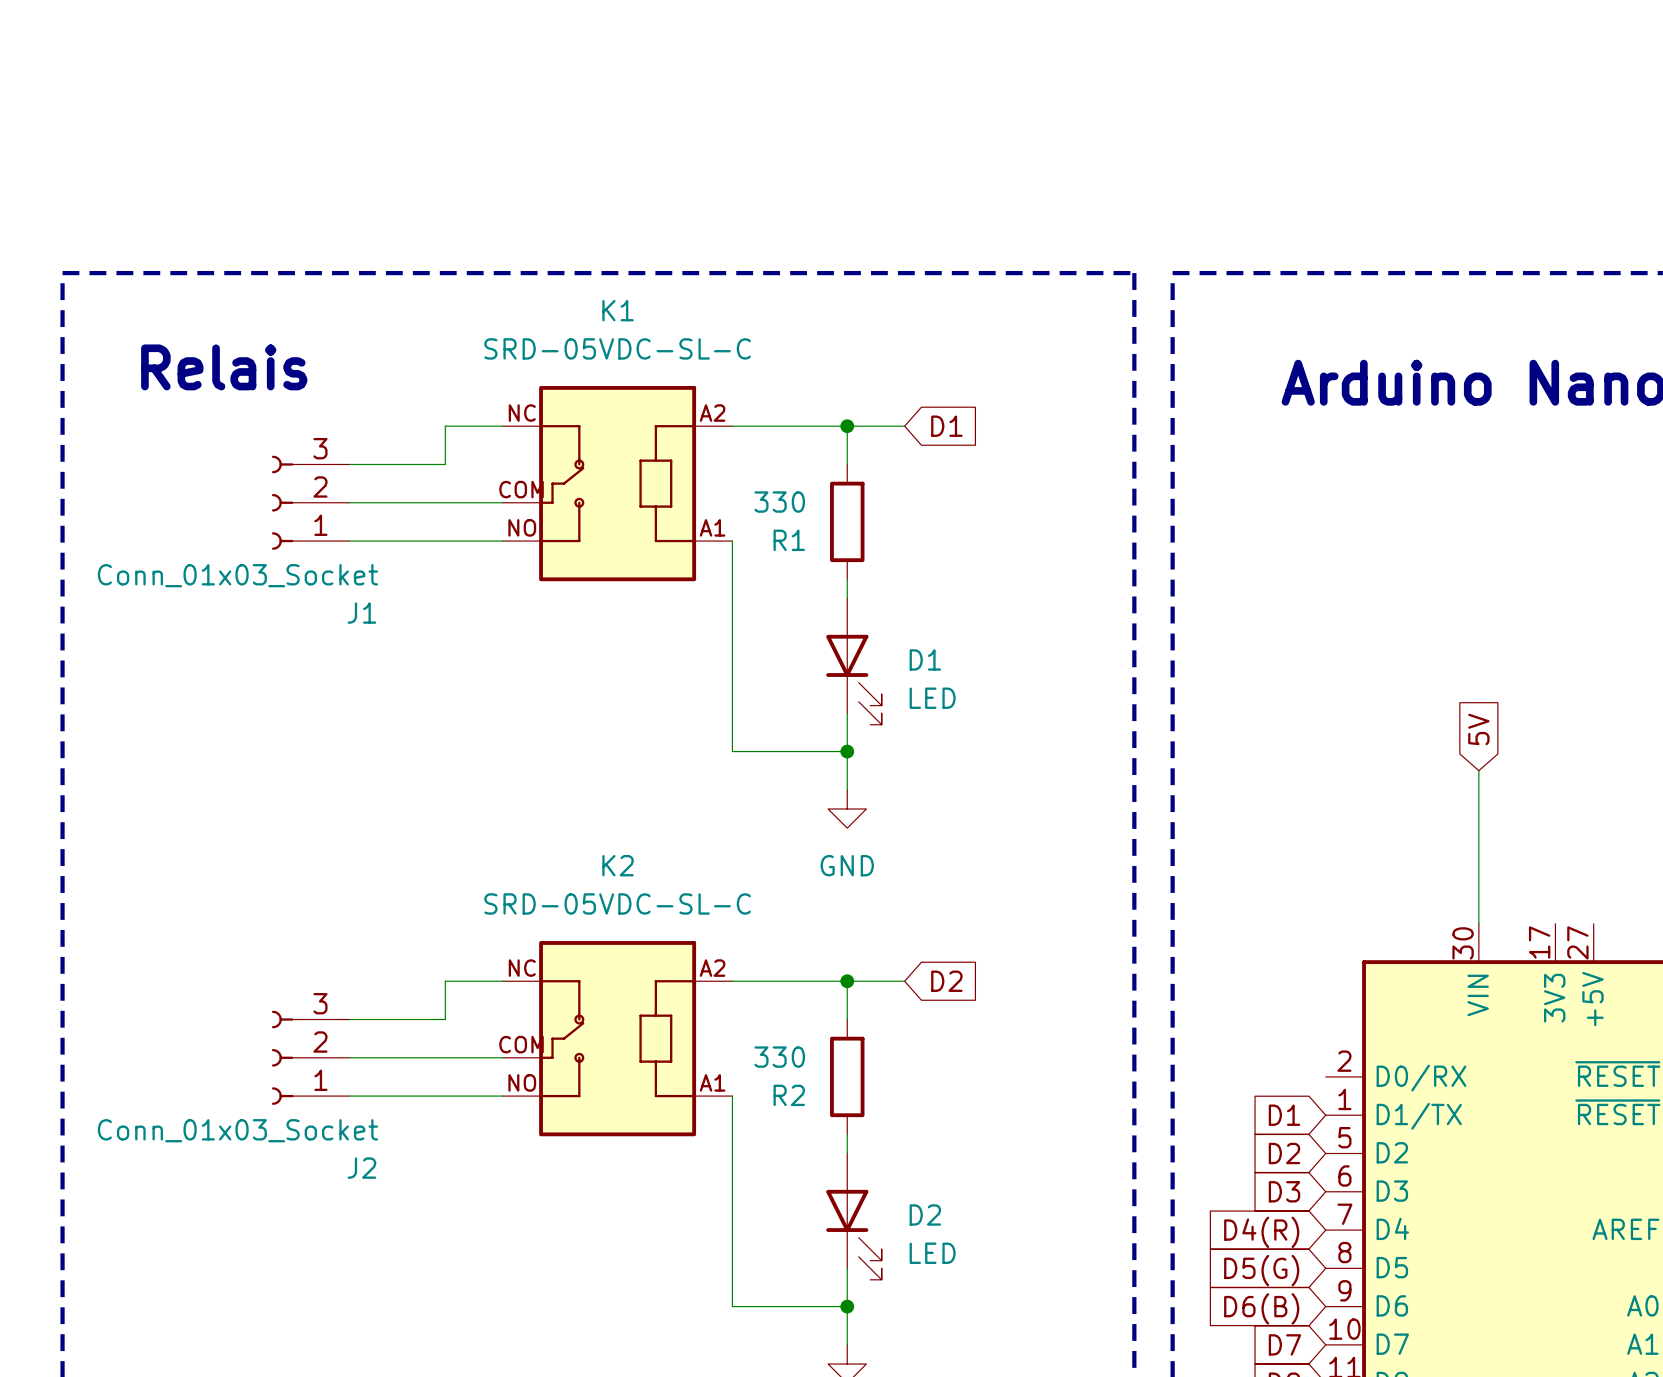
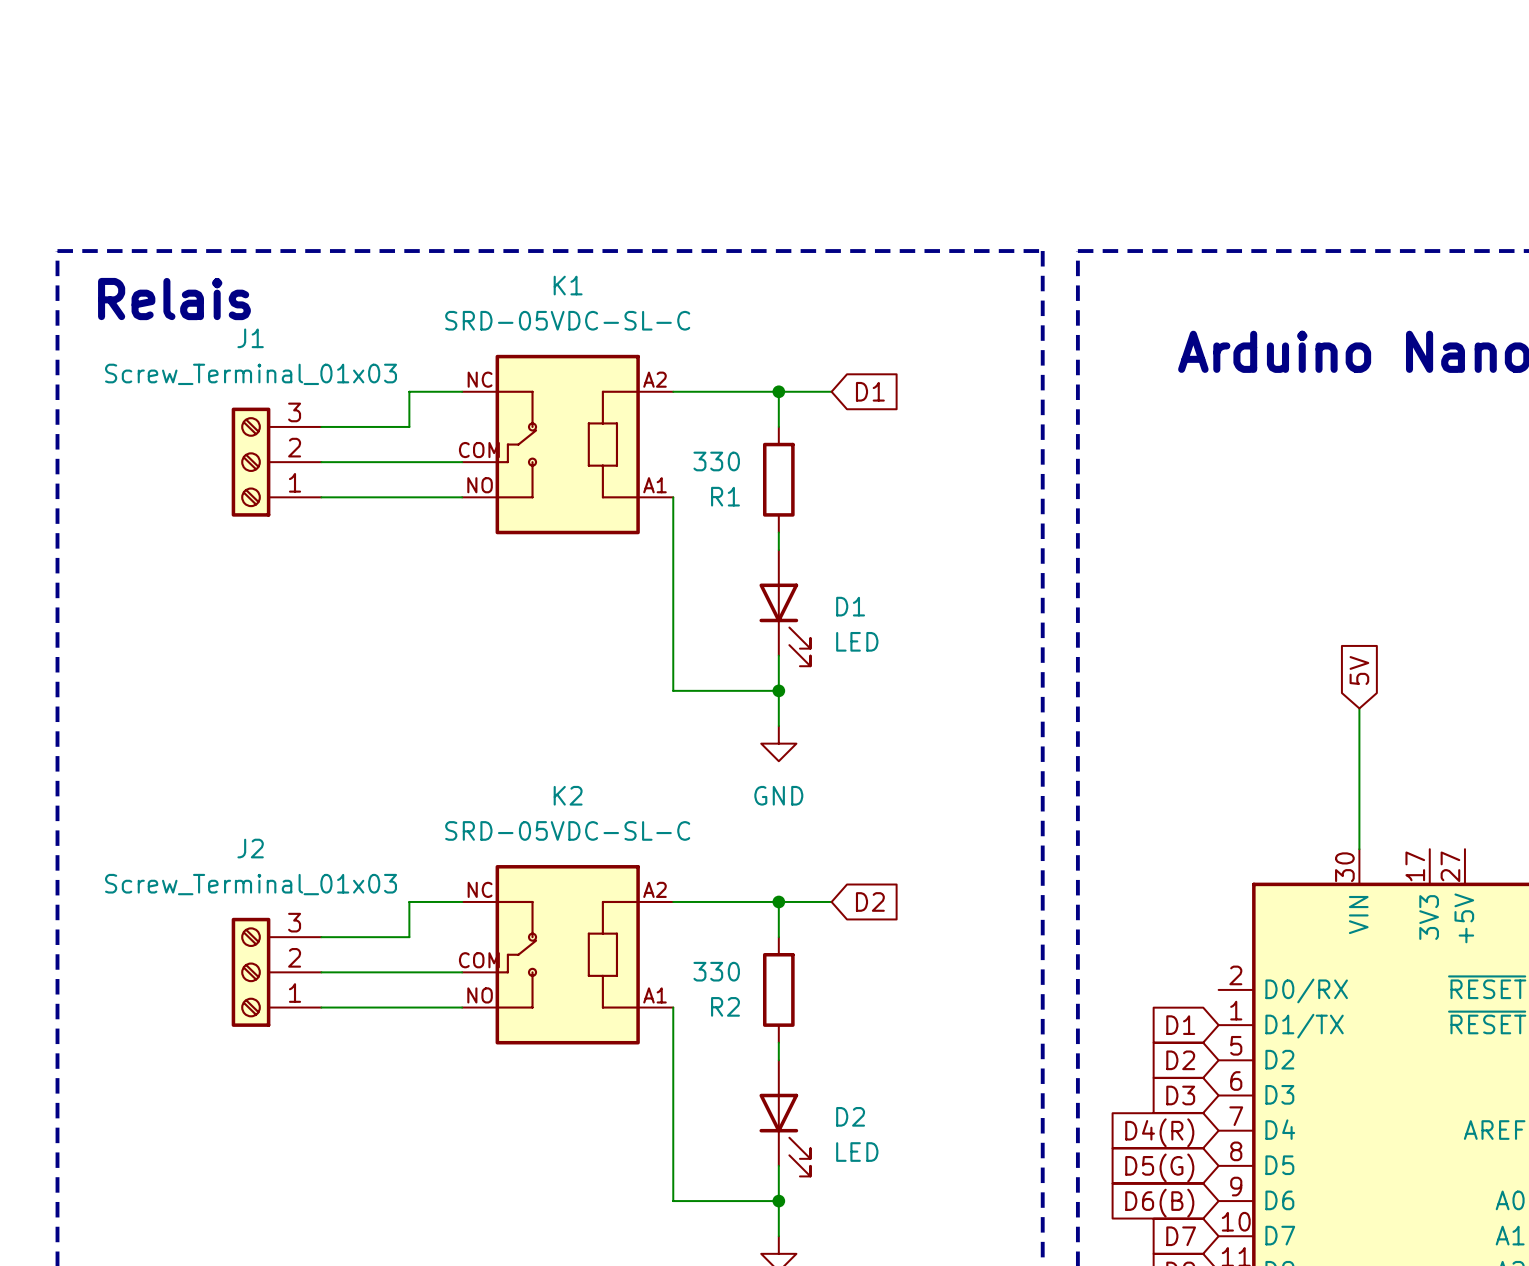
text position: Relais (224, 367) -> Relais (174, 299)
J1 symbol: [271, 455, 350, 550] -> [231, 407, 322, 517]
J1 value: Conn_01x03_Socket (237, 575) -> Screw_Terminal_01x03 (251, 374)
J1 name position: J1 (361, 613) -> J1 (250, 338)
J2 symbol: [271, 1010, 350, 1105] -> [231, 917, 322, 1027]
J2 value: Conn_01x03_Socket (237, 1130) -> Screw_Terminal_01x03 (251, 884)
J2 name position: J2 (361, 1168) -> J2 (250, 848)

